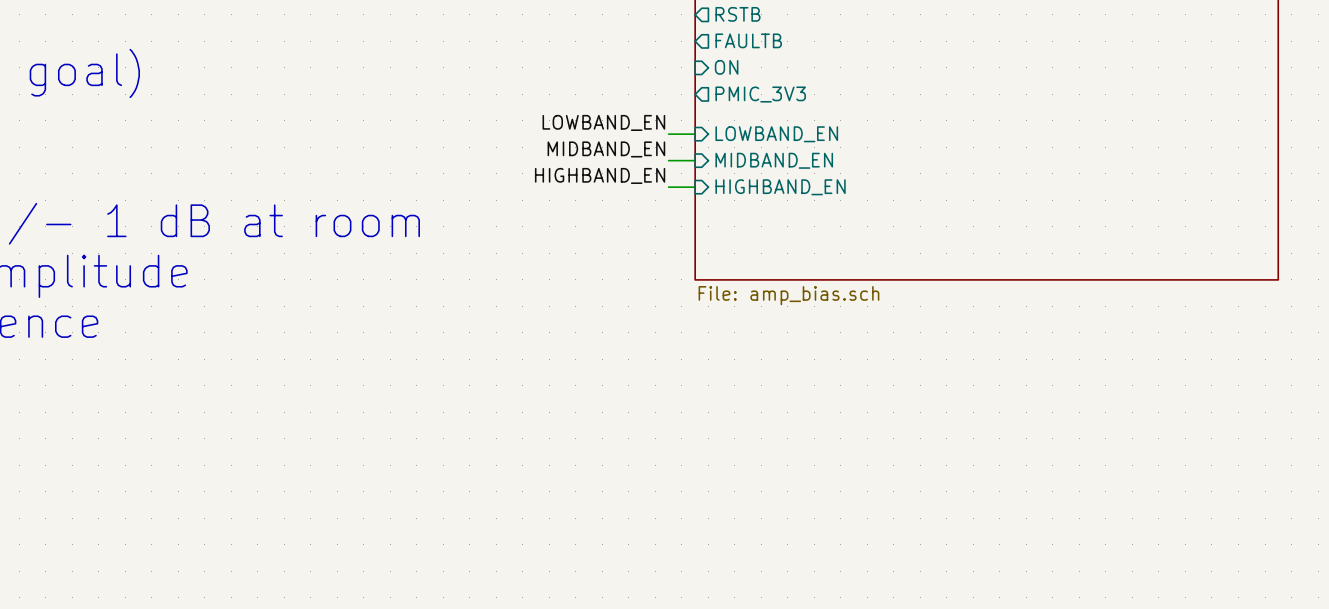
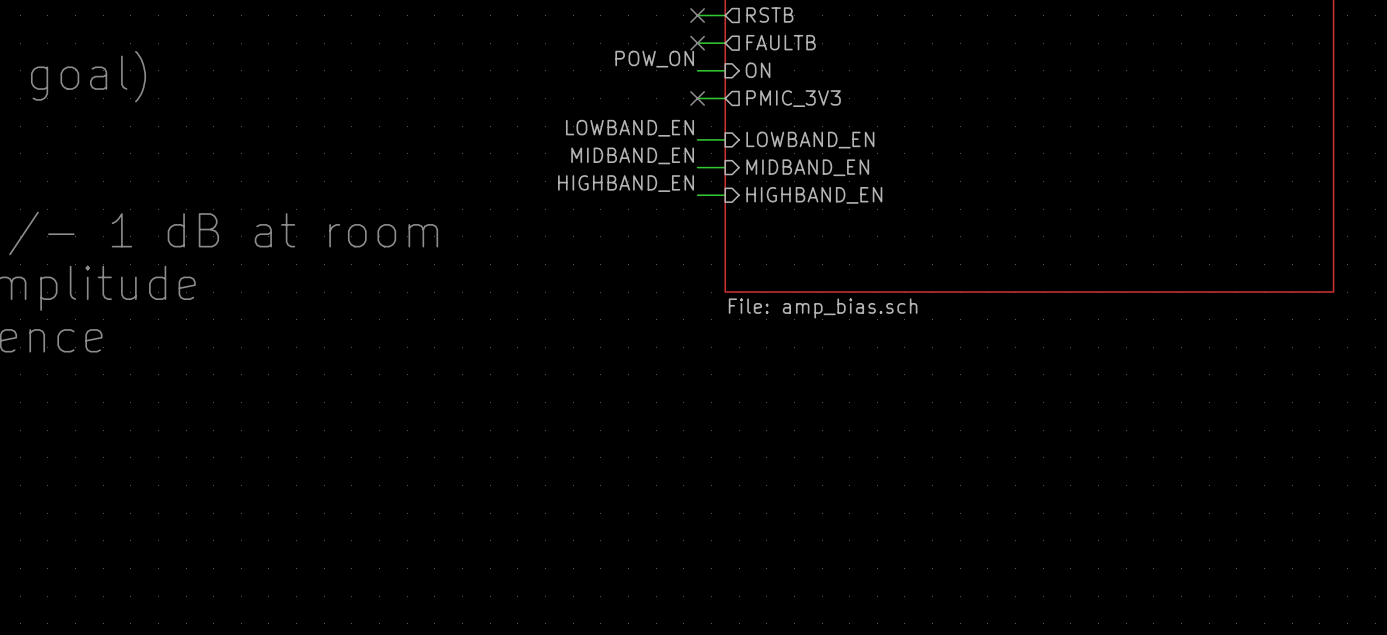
wire: none -> (697, 15) (725, 15)
no-connect mark: none -> (697, 15)
wire: none -> (697, 43) (725, 43)
no-connect mark: none -> (697, 43)
label: none -> POW_ON (654, 59)
wire: none -> (697, 70) (725, 70)
wire: none -> (697, 98) (725, 98)
no-connect mark: none -> (697, 98)

